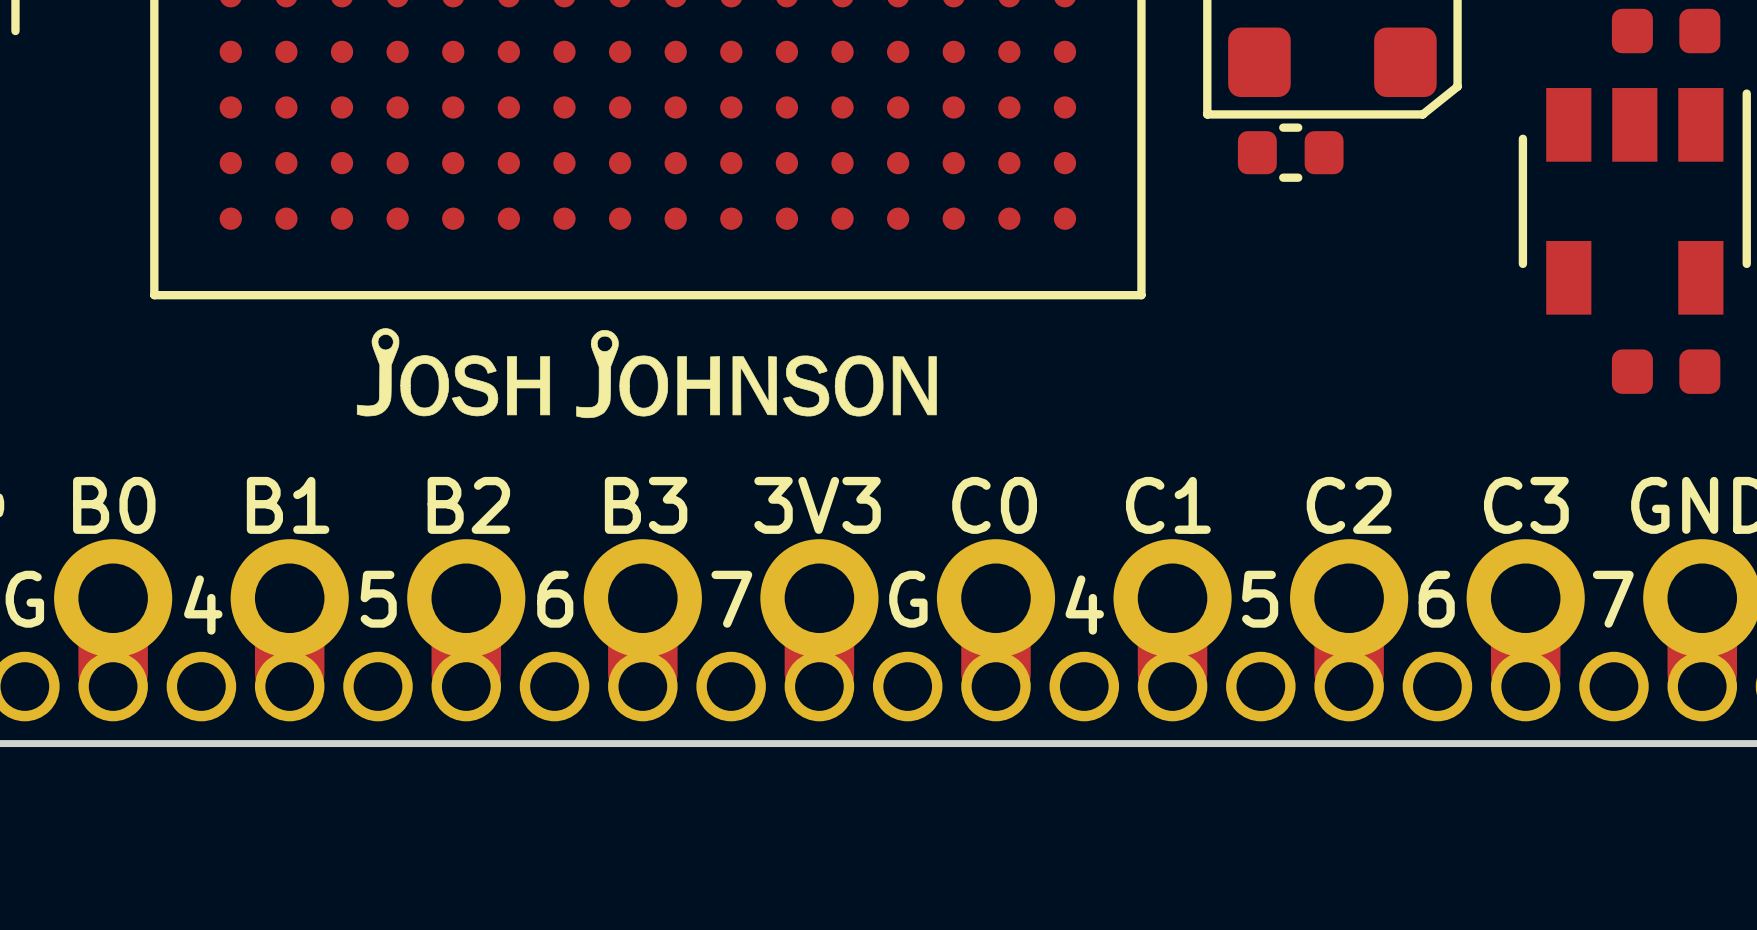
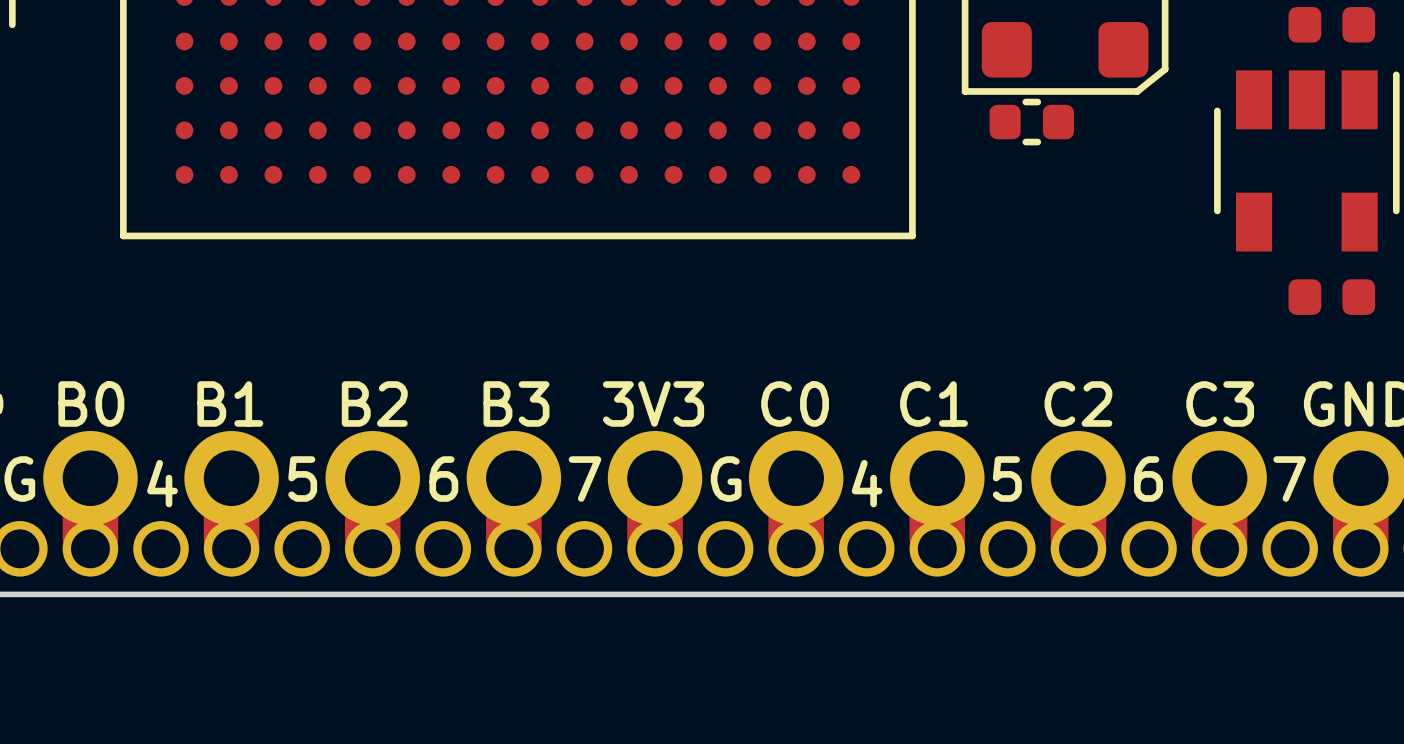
drawing: [356, 328, 937, 419] -> none

